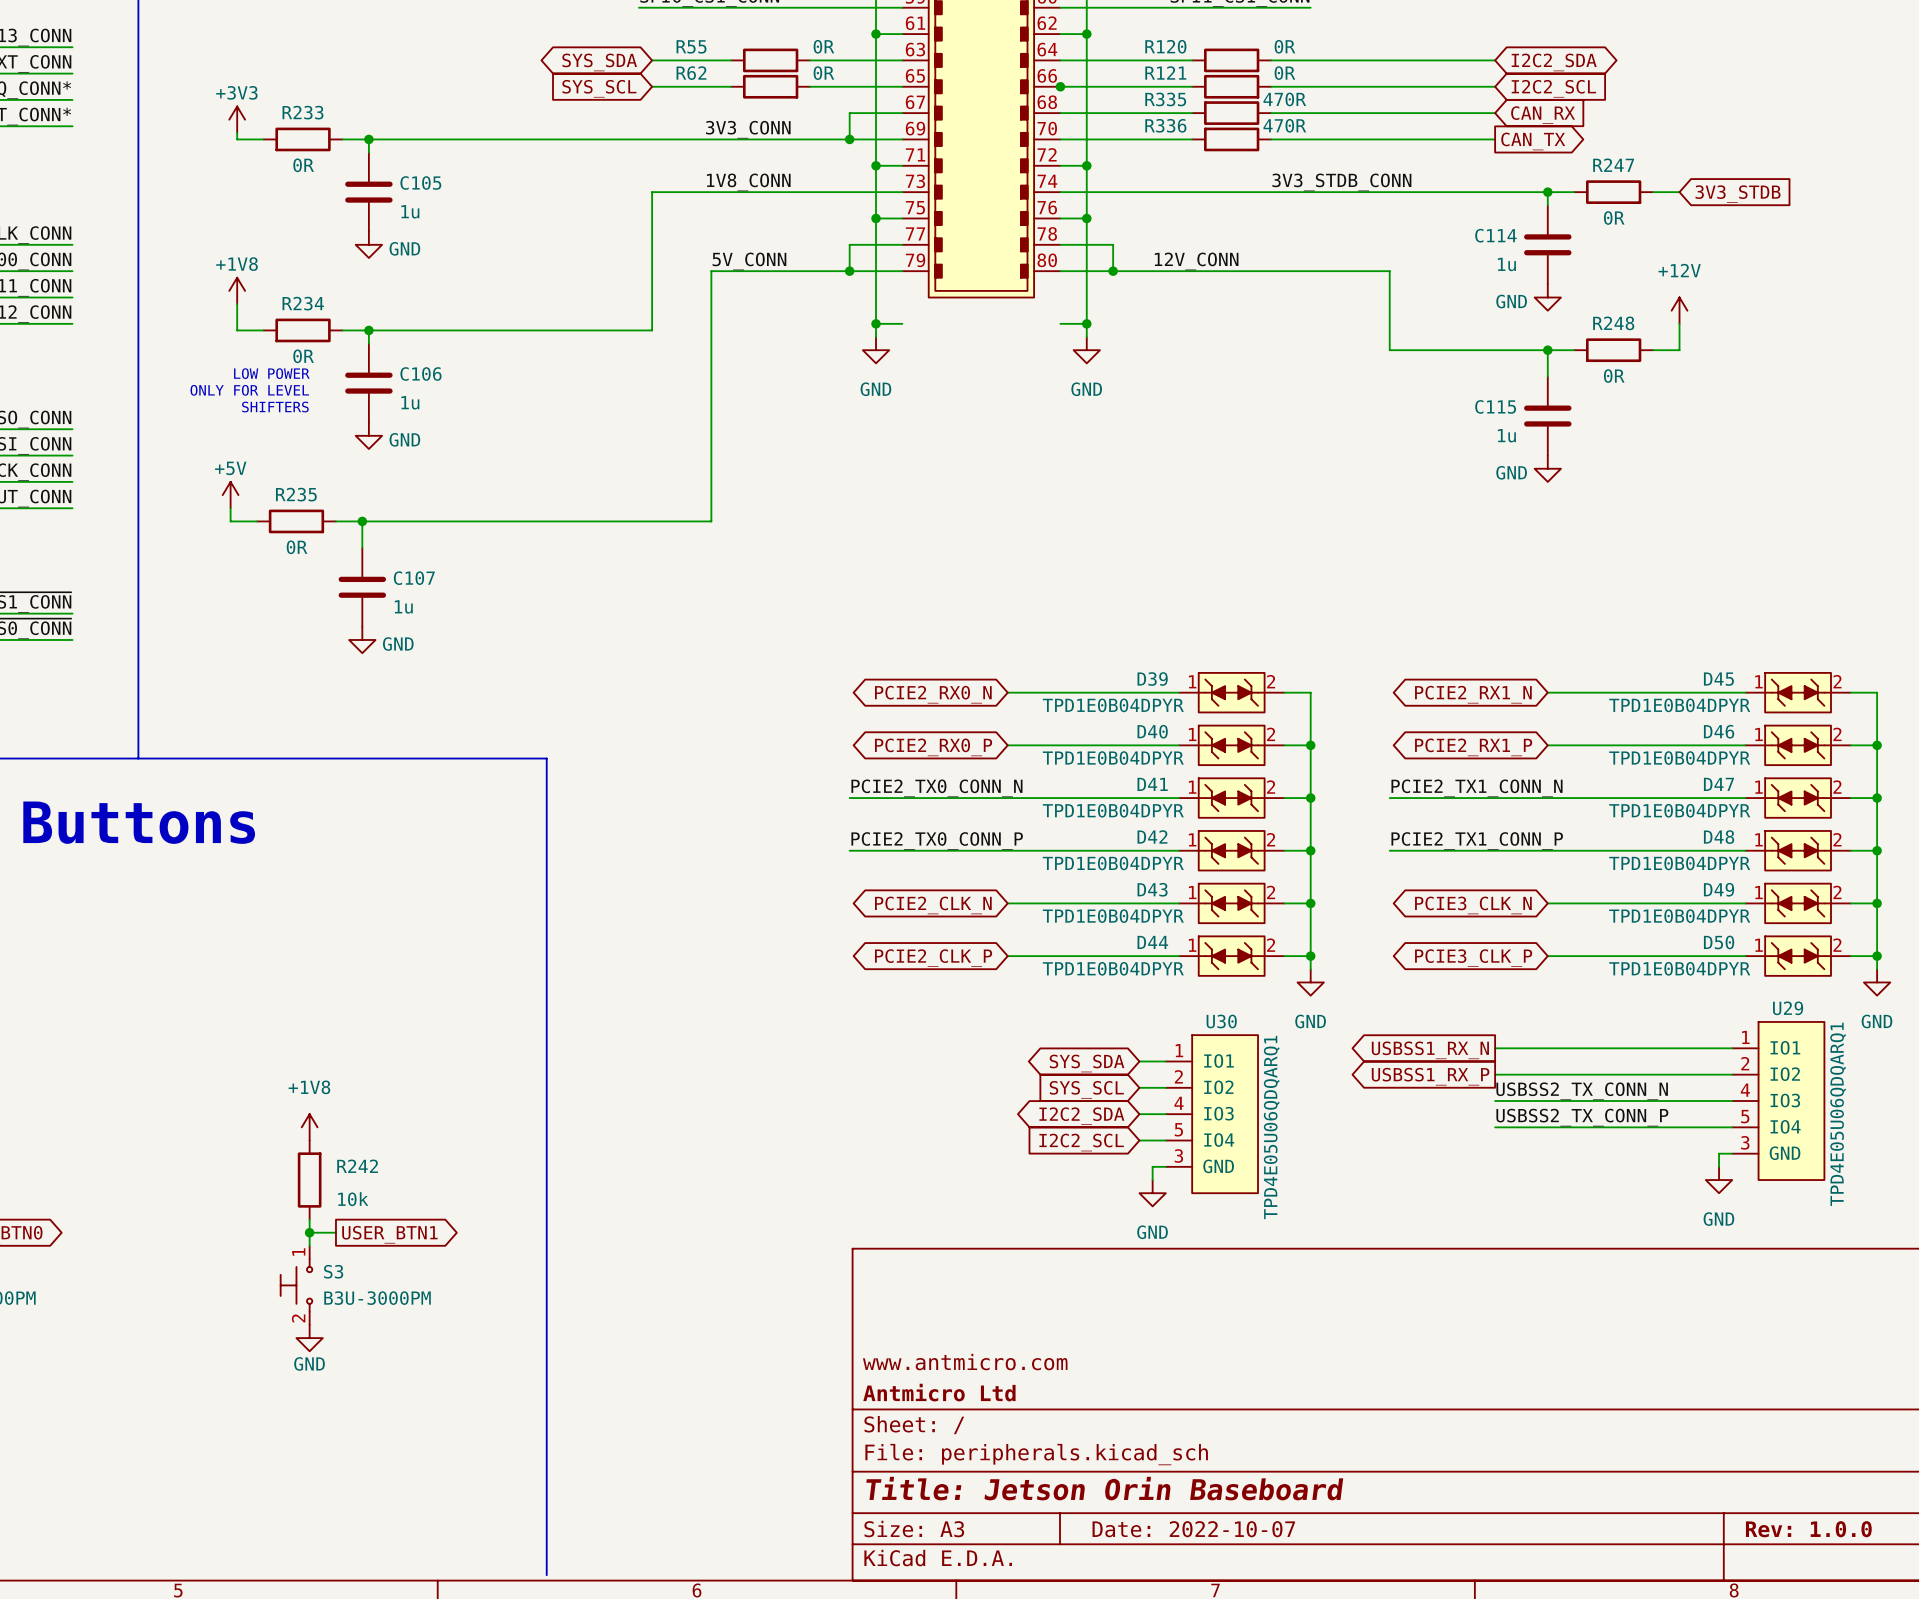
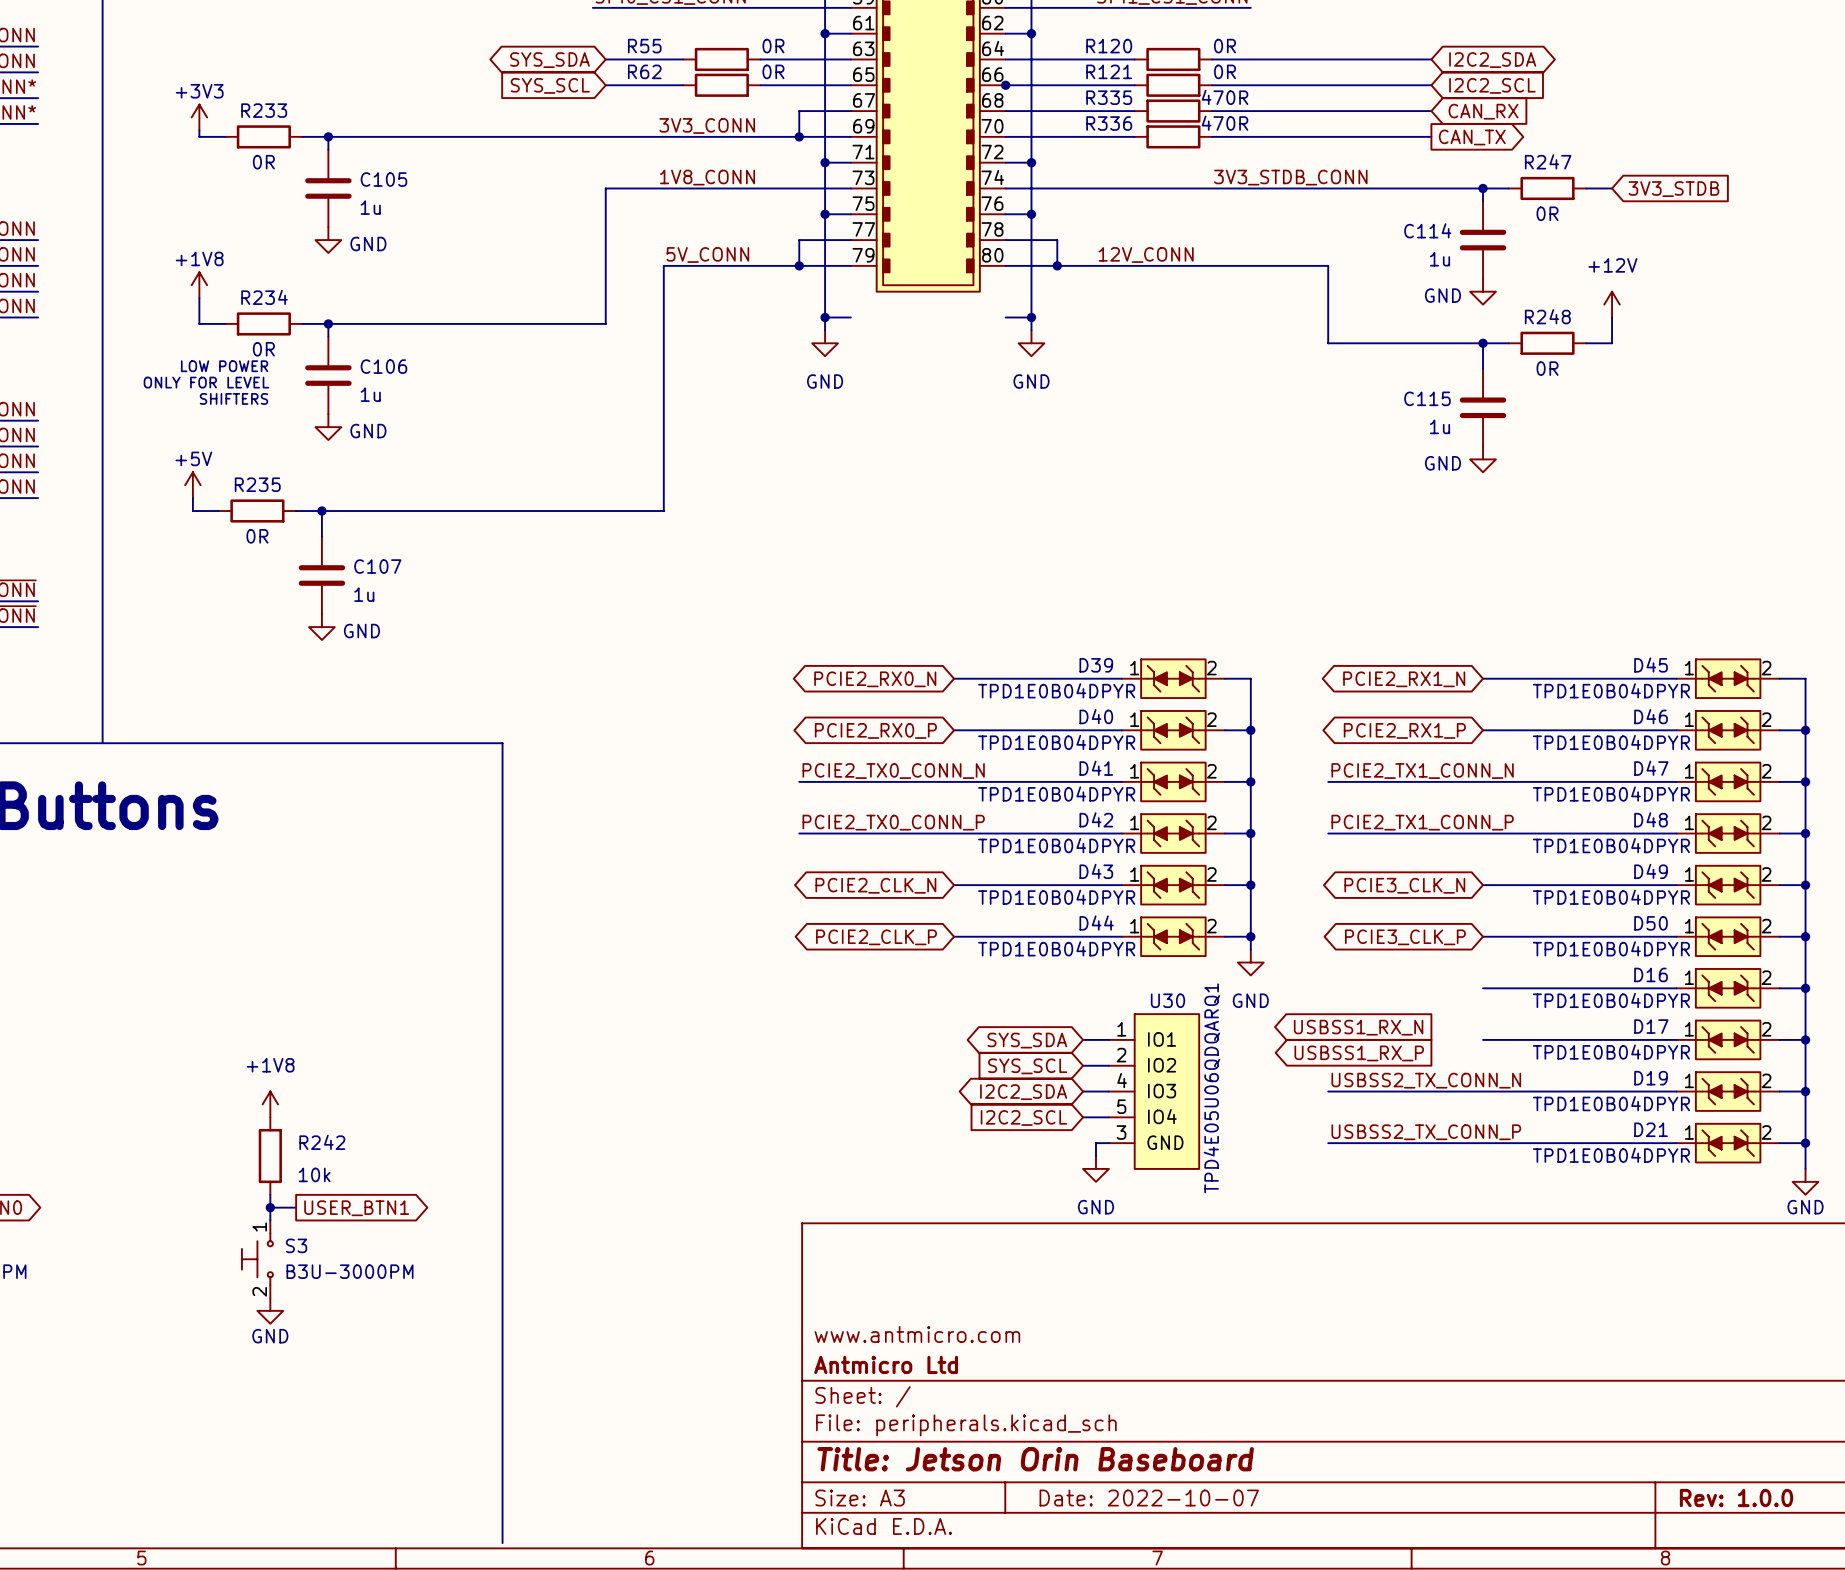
wire: none -> (1805, 949) (1805, 1168)
power symbol: GND (1877, 982) -> none
wire: none -> (1483, 988) (1676, 988)
D16: none -> TPD1E0B04DPYR (1728, 988)
wire: none -> (1779, 988) (1805, 988)
junction: none -> (1805, 988)
wire: (1495, 1048) (1732, 1048) -> none
wire: none -> (1483, 1039) (1676, 1039)
D17: none -> TPD1E0B04DPYR (1728, 1039)
wire: none -> (1779, 1039) (1805, 1039)
junction: none -> (1805, 1039)
wire: (1495, 1074) (1732, 1074) -> none
label position: USBSS2_TX_CONN_N (1582, 1091) -> USBSS2_TX_CONN_N (1426, 1080)
wire: (1495, 1101) (1732, 1101) -> none
U29: (1778, 1101) -> none
wire: none -> (1328, 1091) (1676, 1091)
D19: none -> TPD1E0B04DPYR (1728, 1091)
wire: none -> (1779, 1091) (1805, 1091)
junction: none -> (1805, 1091)
label position: USBSS2_TX_CONN_P (1582, 1117) -> USBSS2_TX_CONN_P (1426, 1132)
wire: (1495, 1127) (1732, 1127) -> none
wire: (1732, 1153) (1719, 1153) (1719, 1166) -> none
wire: none -> (1328, 1143) (1676, 1143)
D21: none -> TPD1E0B04DPYR (1728, 1143)
wire: none -> (1779, 1143) (1805, 1143)
junction: none -> (1805, 1143)
power symbol: GND (1719, 1180) -> none
power symbol: none -> GND (1805, 1181)

